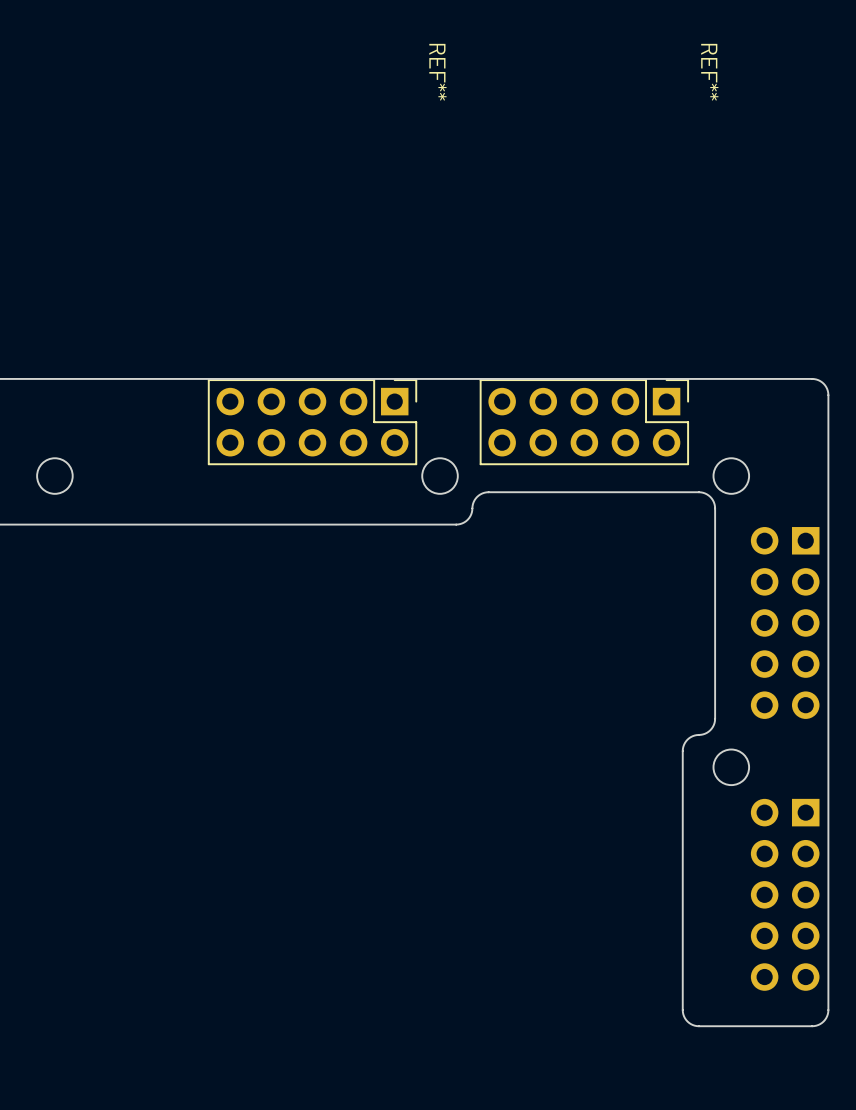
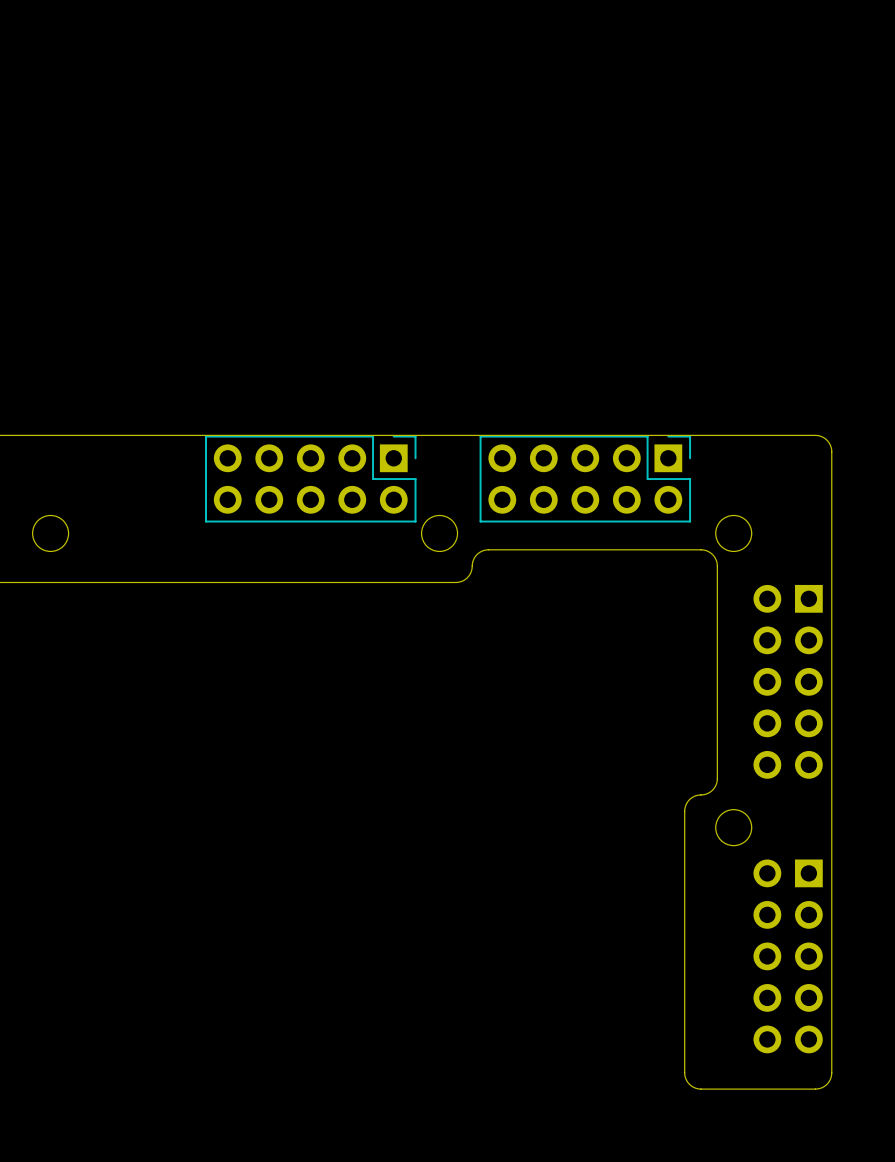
REF** name: REF** (437, 72) -> none
REF** name: REF** (709, 72) -> none

